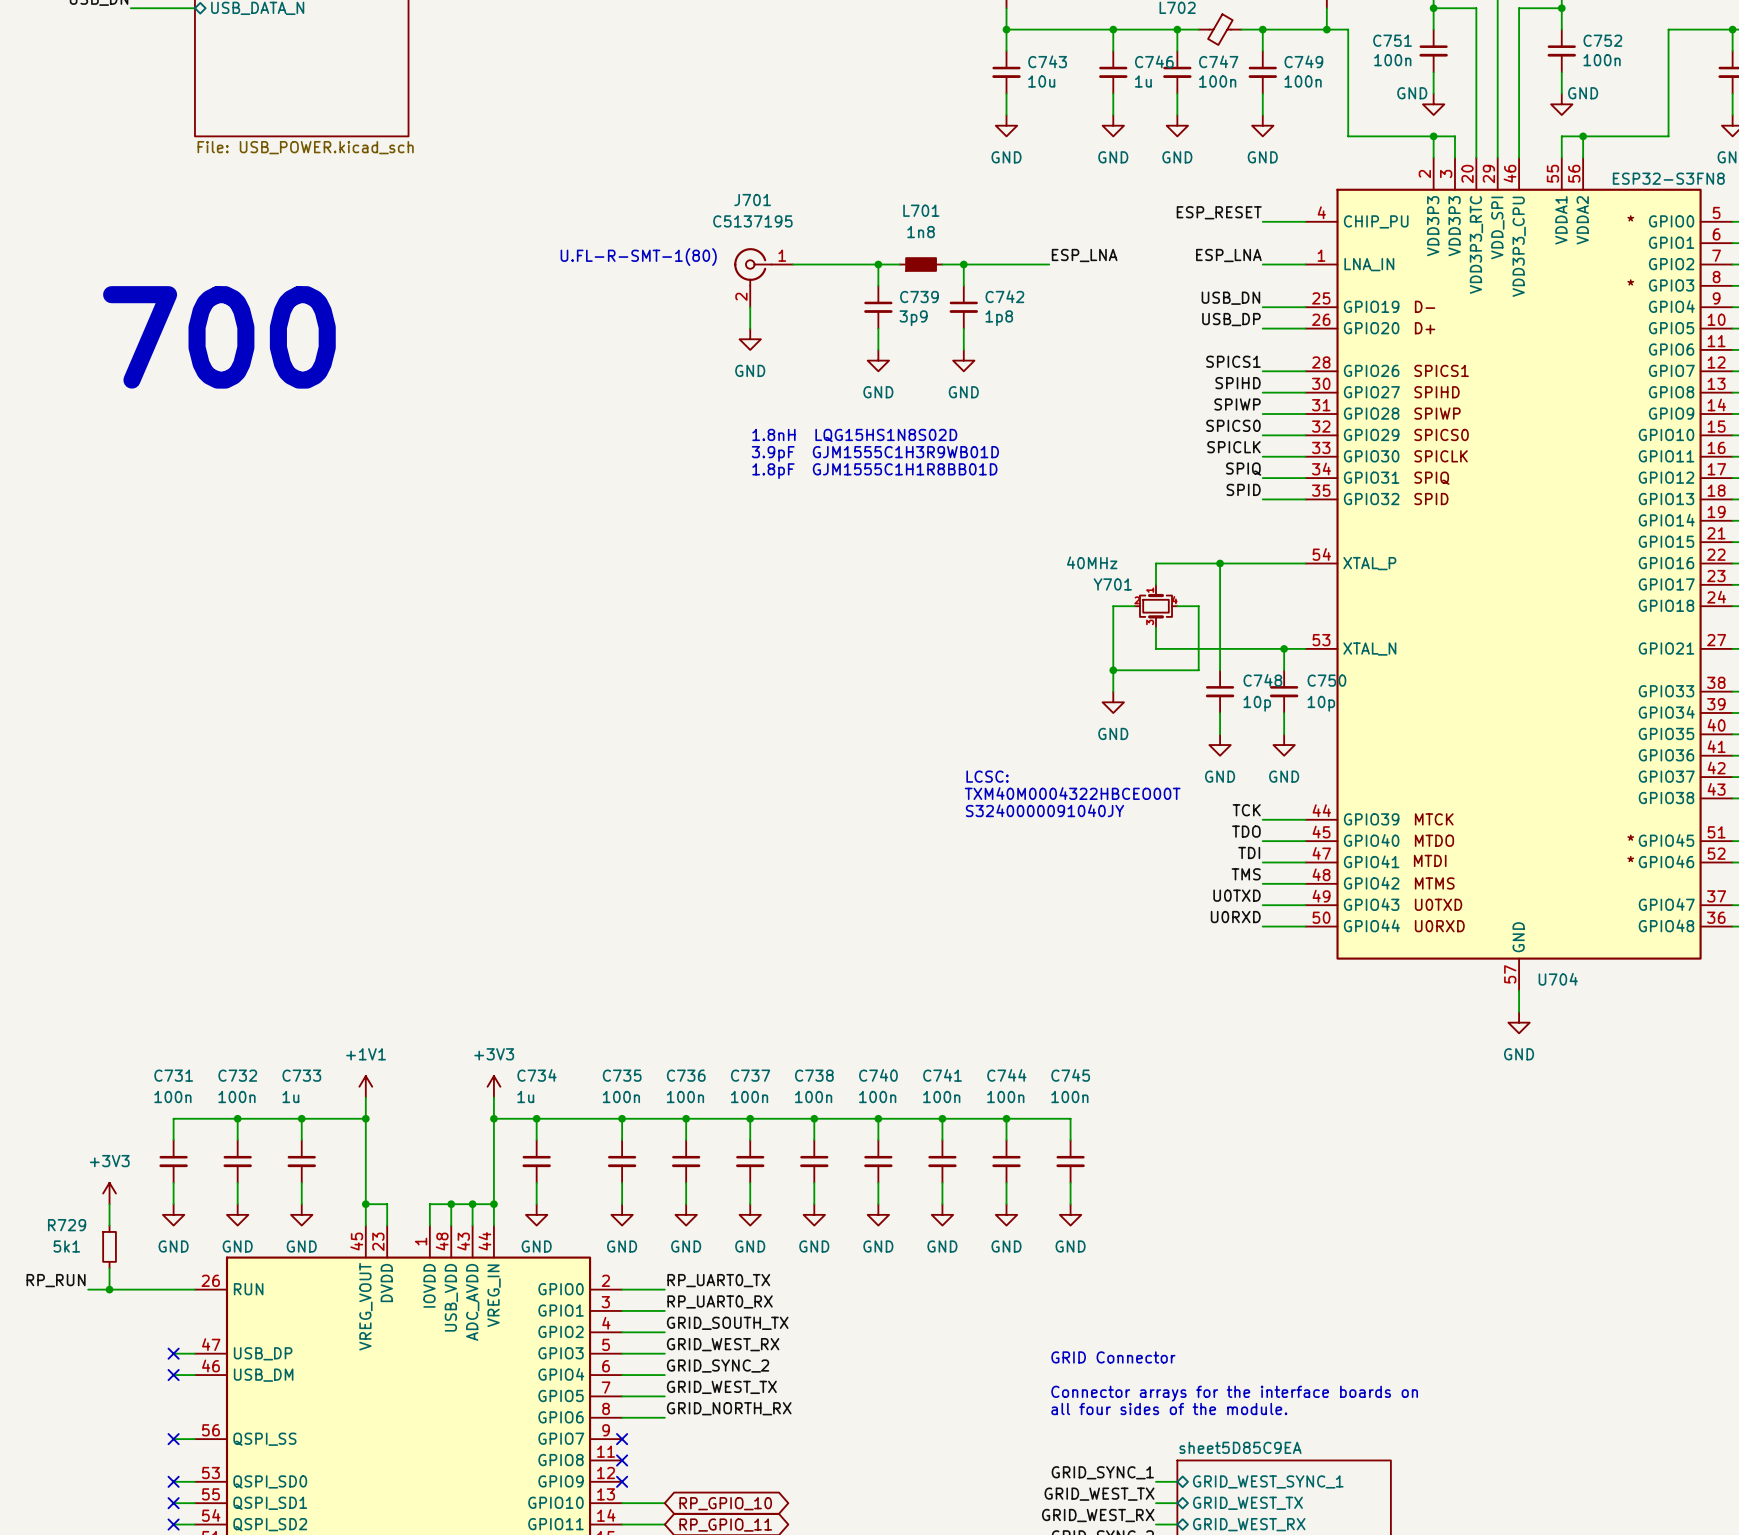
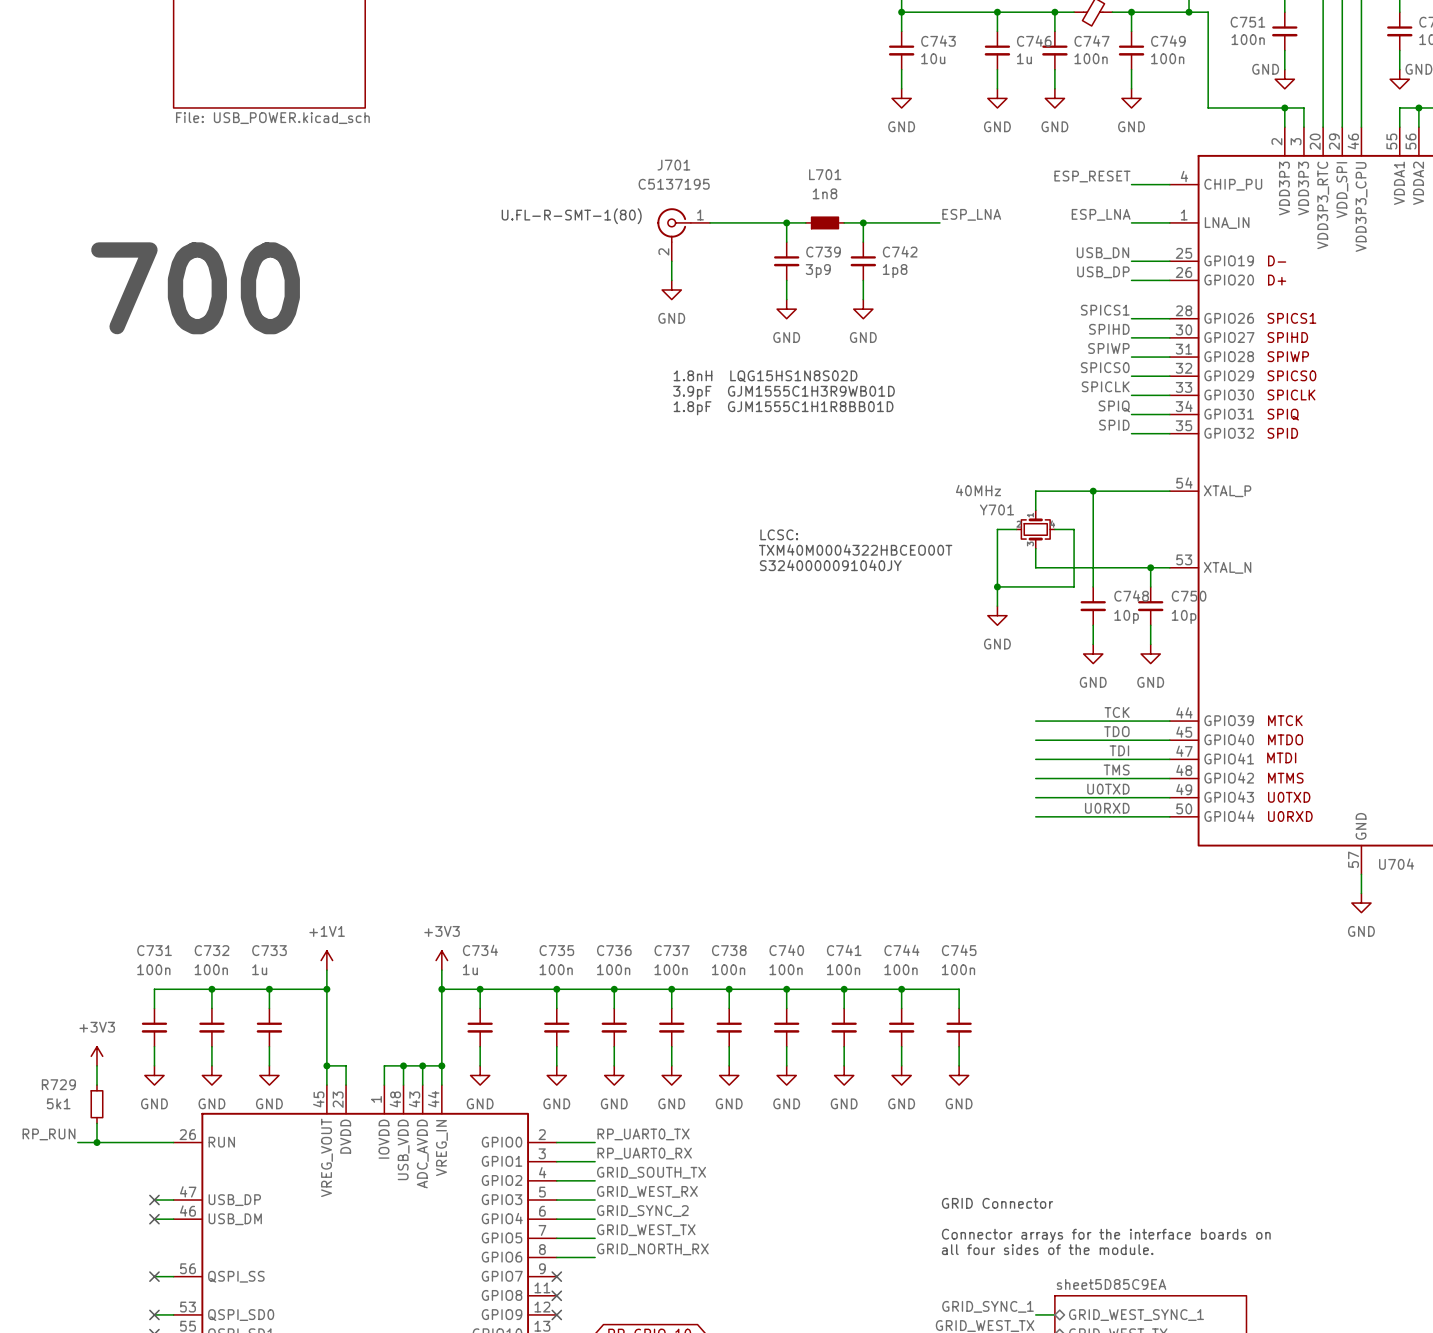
text position: LCSC: (987, 776) -> LCSC: (779, 534)
text position: TXM40M0004322HBCEO00T (1072, 793) -> TXM40M0004322HBCEO00T (855, 550)
text position: S3240000091040JY (1044, 810) -> S3240000091040JY (830, 565)
wire: none -> (1035, 721) (1131, 721)
wire: none -> (1035, 740) (1131, 740)
wire: none -> (1035, 759) (1131, 759)
wire: none -> (1035, 778) (1131, 778)
wire: none -> (1035, 797) (1131, 797)
wire: none -> (1035, 816) (1131, 816)

